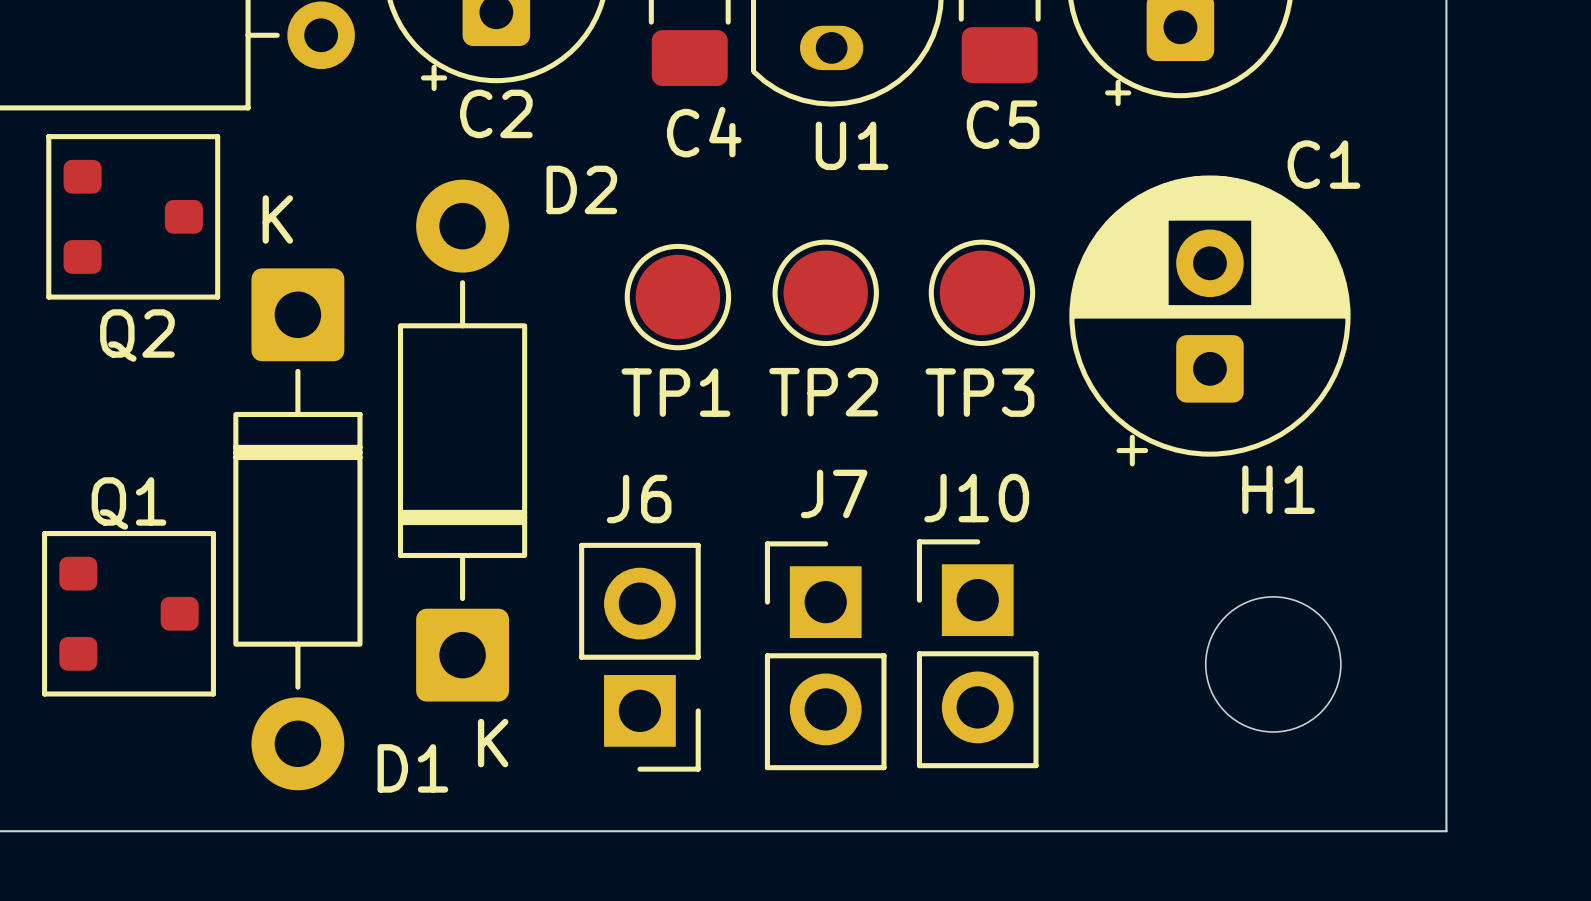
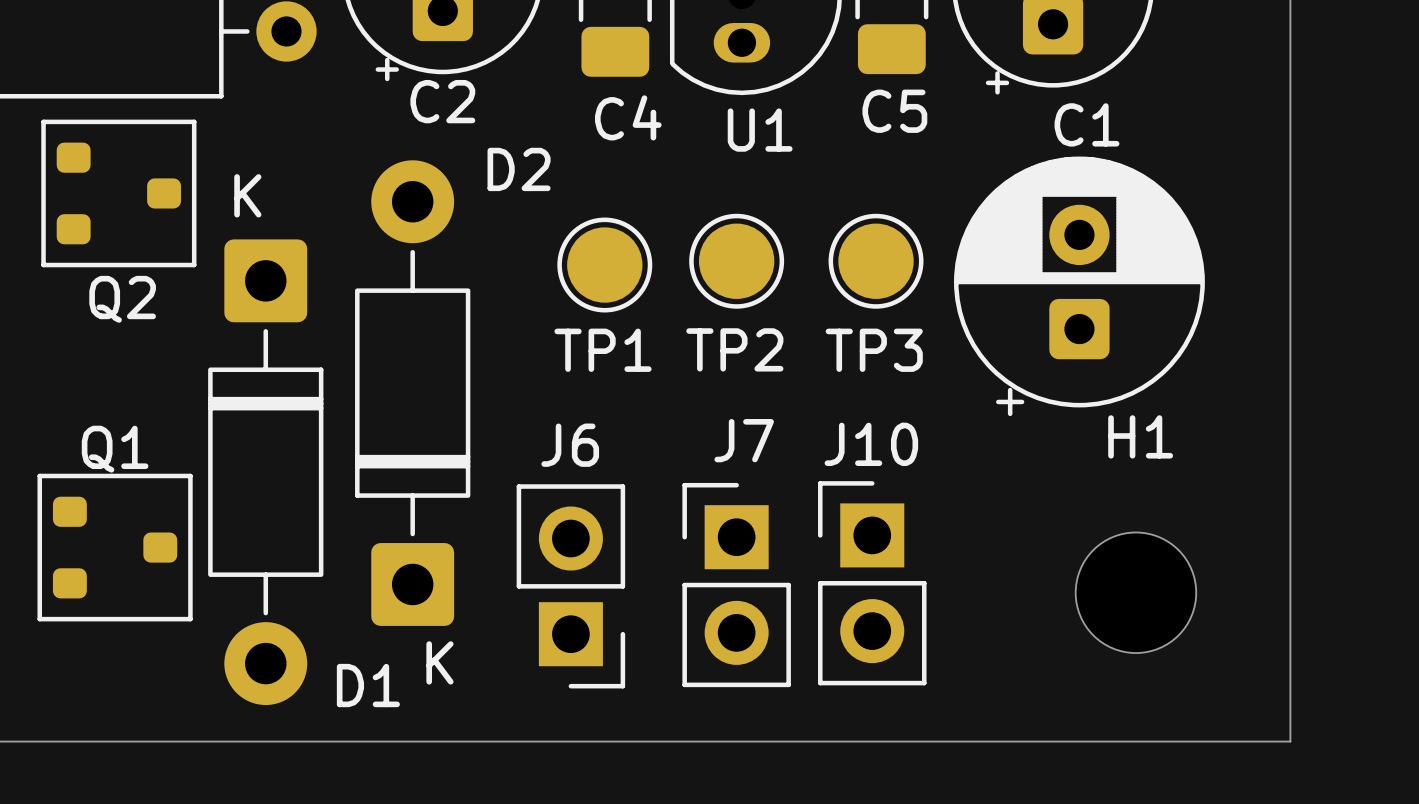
C1 name position: C1 (1323, 164) -> C1 (1086, 124)

